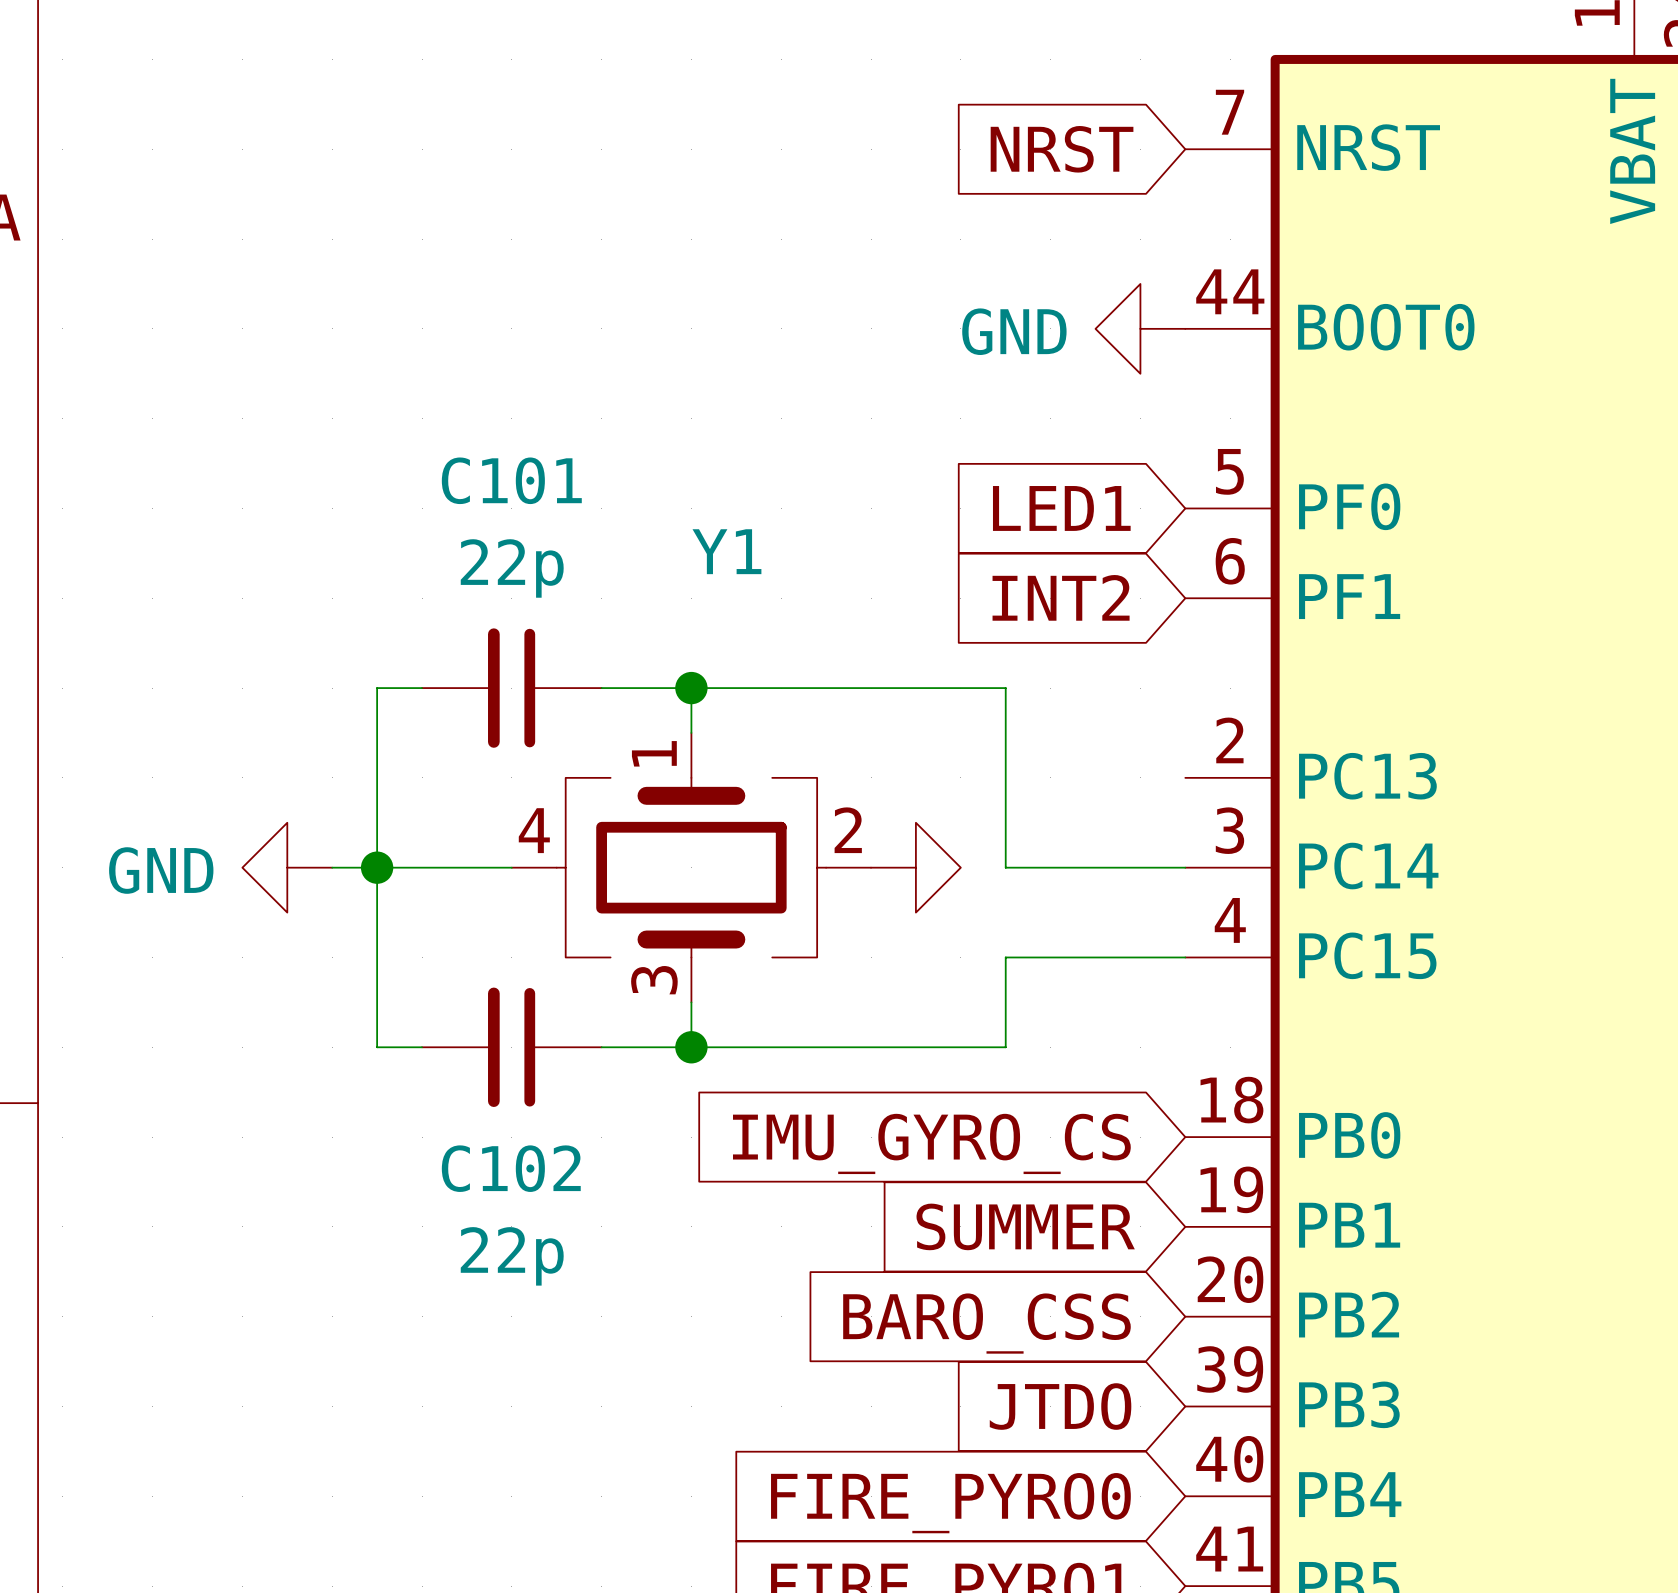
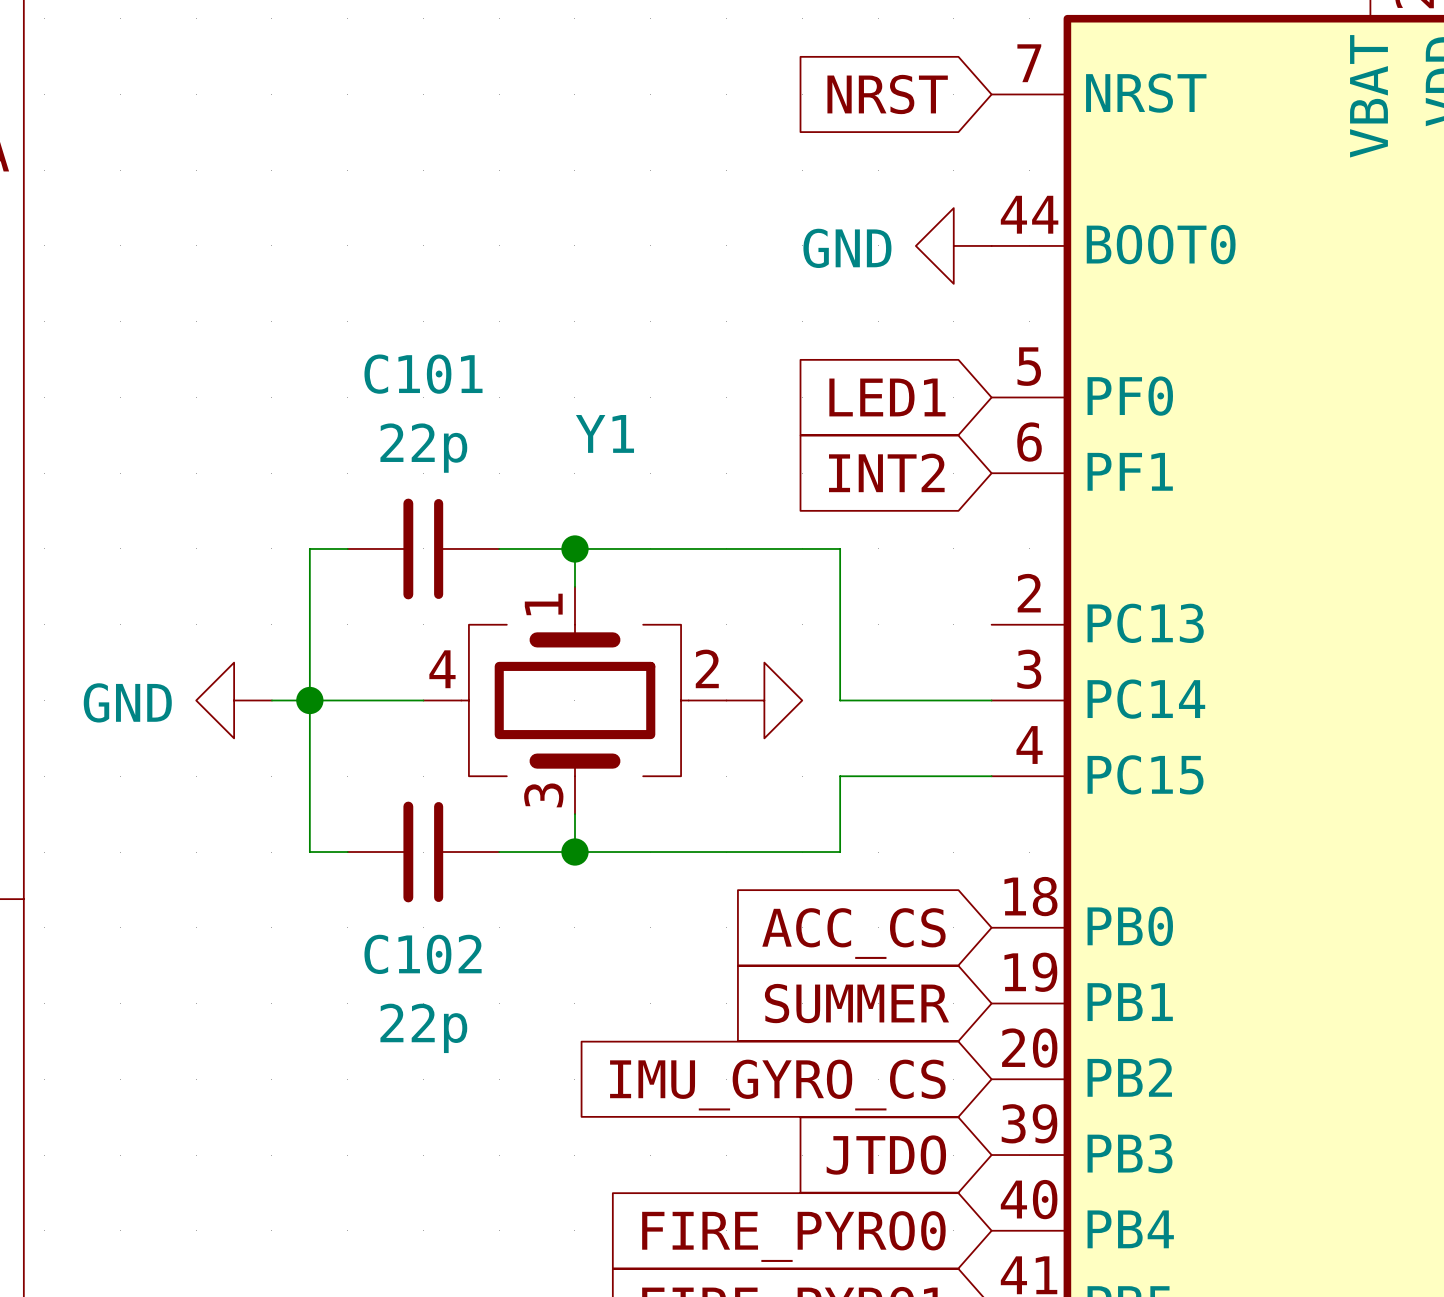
global label: IMU_GYRO_CS (931, 1143) -> ACC_CS (853, 933)
global label: BARO_CSS (986, 1323) -> IMU_GYRO_CS (777, 1085)

